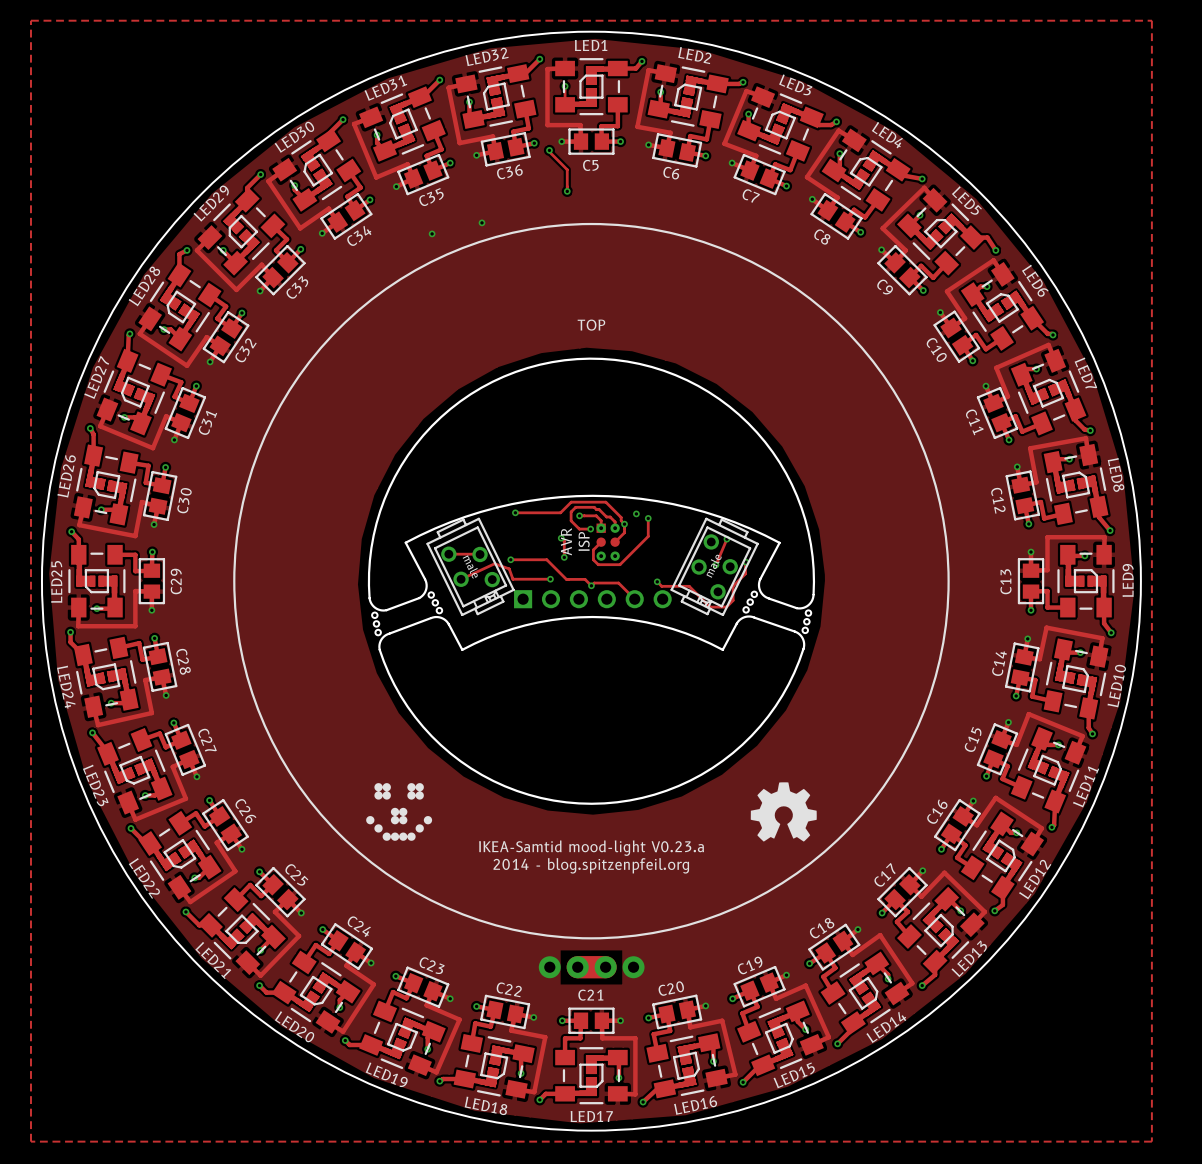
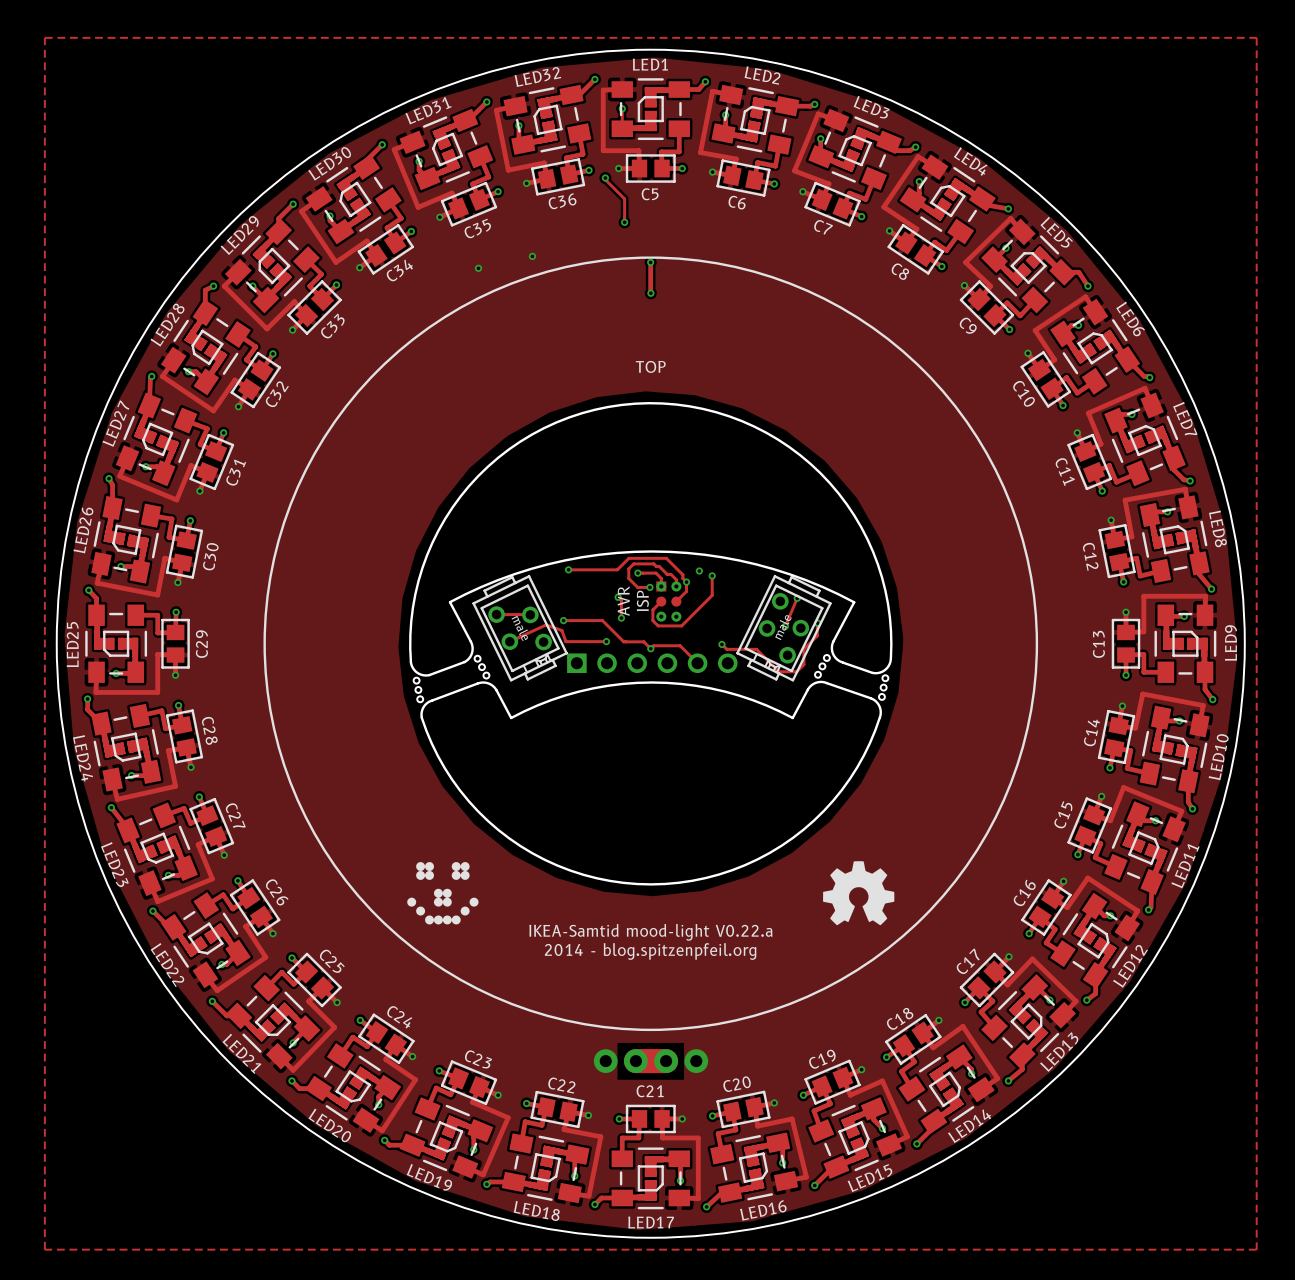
track: none -> (650, 262) (650, 293)
via: none -> (650, 262)
via: none -> (650, 293)
text: IKEA-Samtid mood-light V0.23.a (591, 848) -> IKEA-Samtid mood-light V0.22.a (650, 932)

